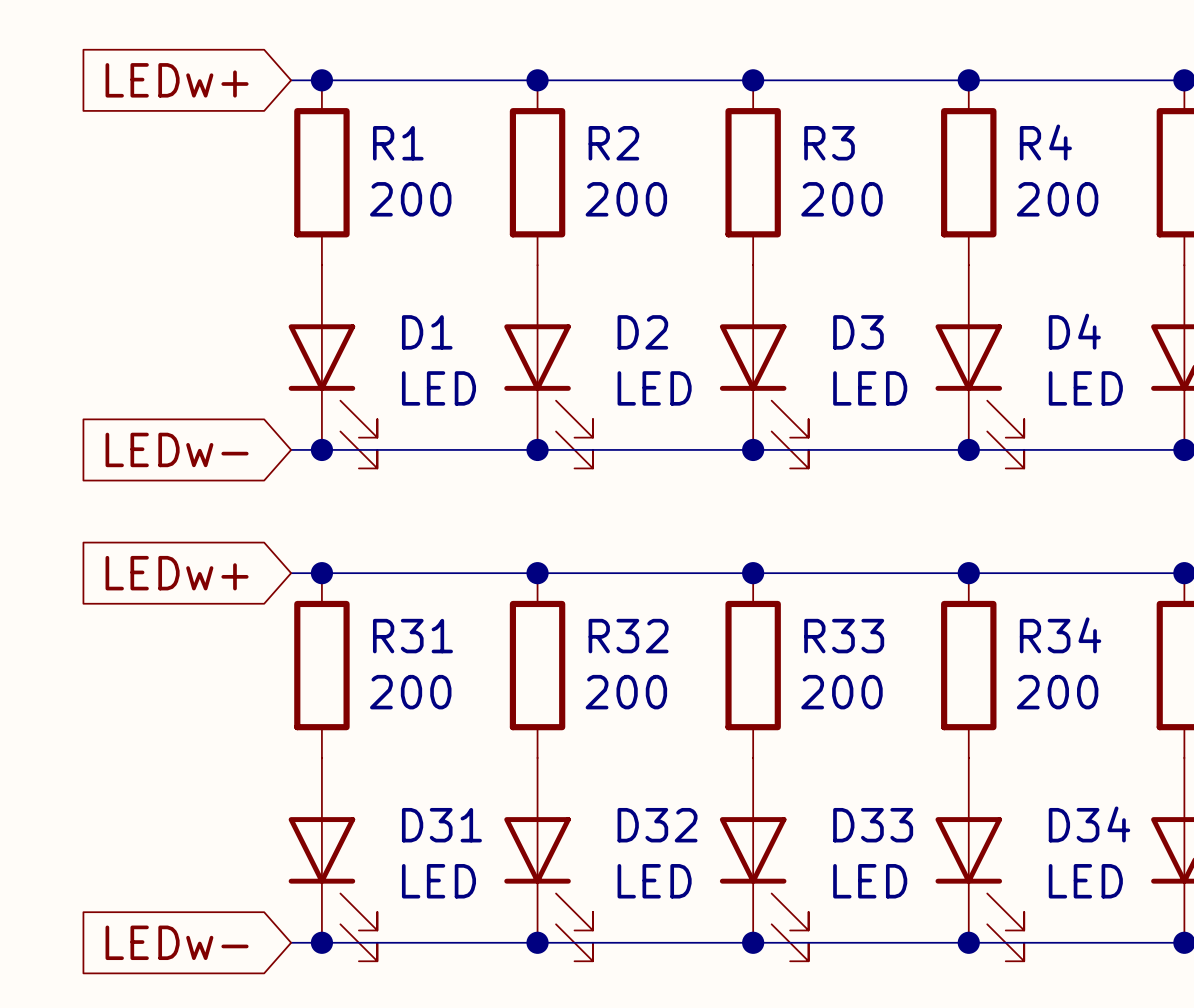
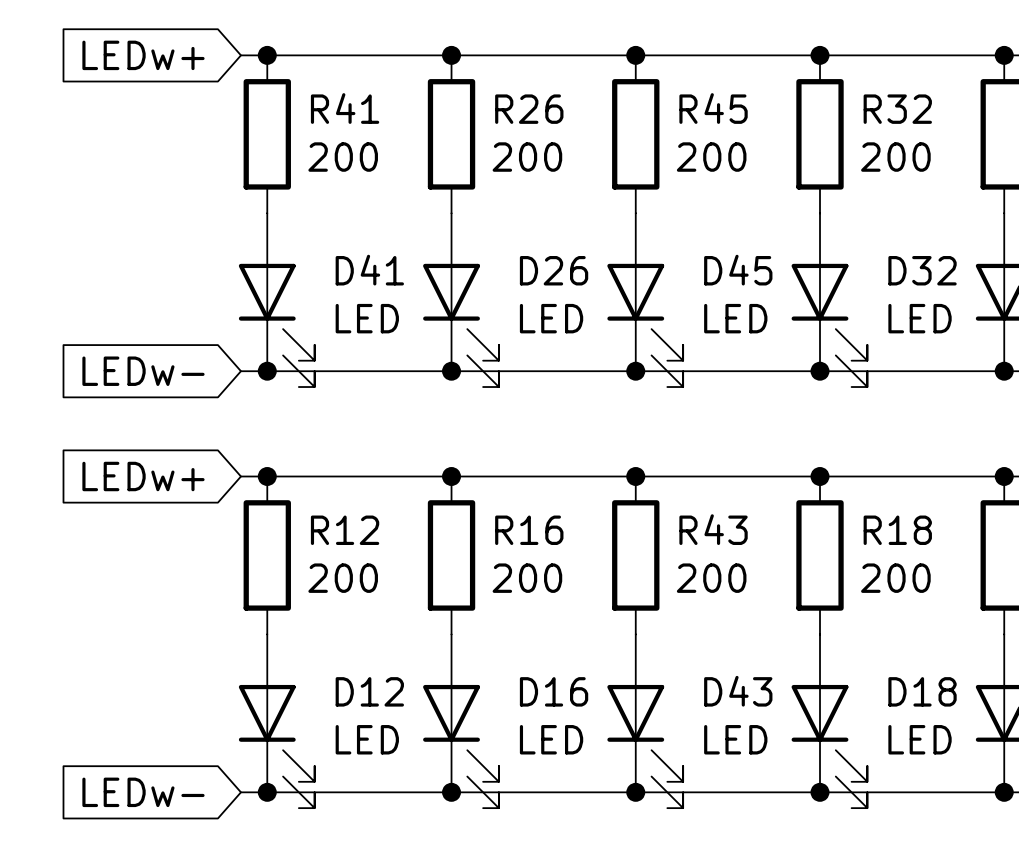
R4 name: R4 (1045, 142) -> R32 (897, 109)
R1 name: R1 (398, 143) -> R41 (345, 108)
R2 name: R2 (613, 143) -> R26 (529, 109)
R3 name: R3 (829, 143) -> R45 (713, 108)
D4 name: D4 (1074, 331) -> D32 (922, 270)
D1 name: D1 (427, 332) -> D41 (369, 270)
D2 name: D2 (642, 332) -> D26 (554, 270)
D3 name: D3 (858, 332) -> D45 (738, 270)
R34 name: R34 (1060, 635) -> R18 (897, 530)
R31 name: R31 (412, 636) -> R12 (345, 530)
R32 name: R32 (628, 636) -> R16 (529, 530)
R33 name: R33 (844, 636) -> R43 (713, 529)
D34 name: D34 (1089, 824) -> D18 (922, 691)
D31 name: D31 (441, 825) -> D12 (369, 691)
D32 name: D32 (657, 825) -> D16 (554, 691)
D33 name: D33 (873, 825) -> D43 (738, 691)

